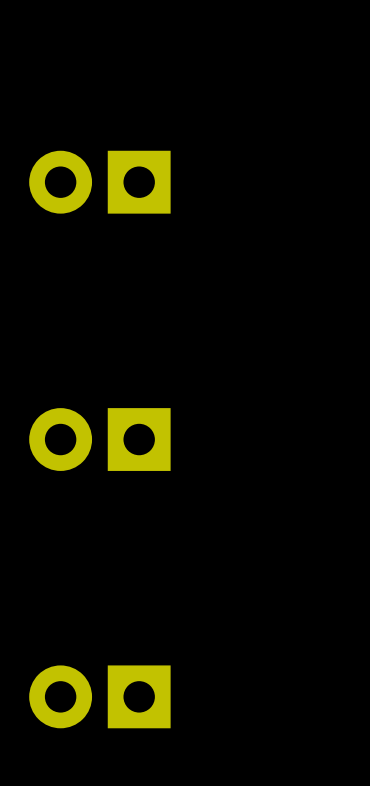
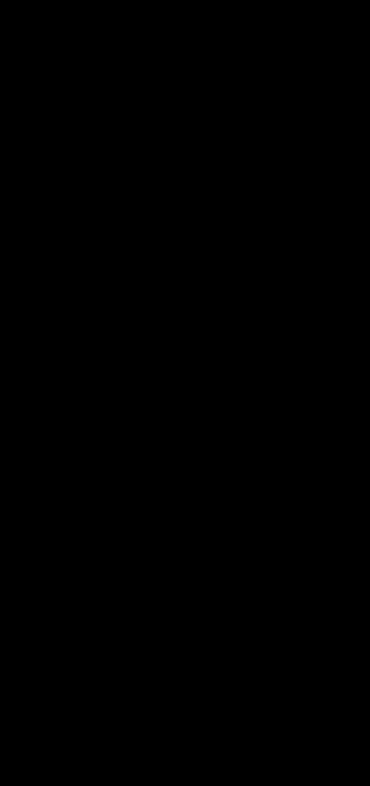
part: (99, 182) -> none
part: (99, 439) -> none
part: (99, 696) -> none

